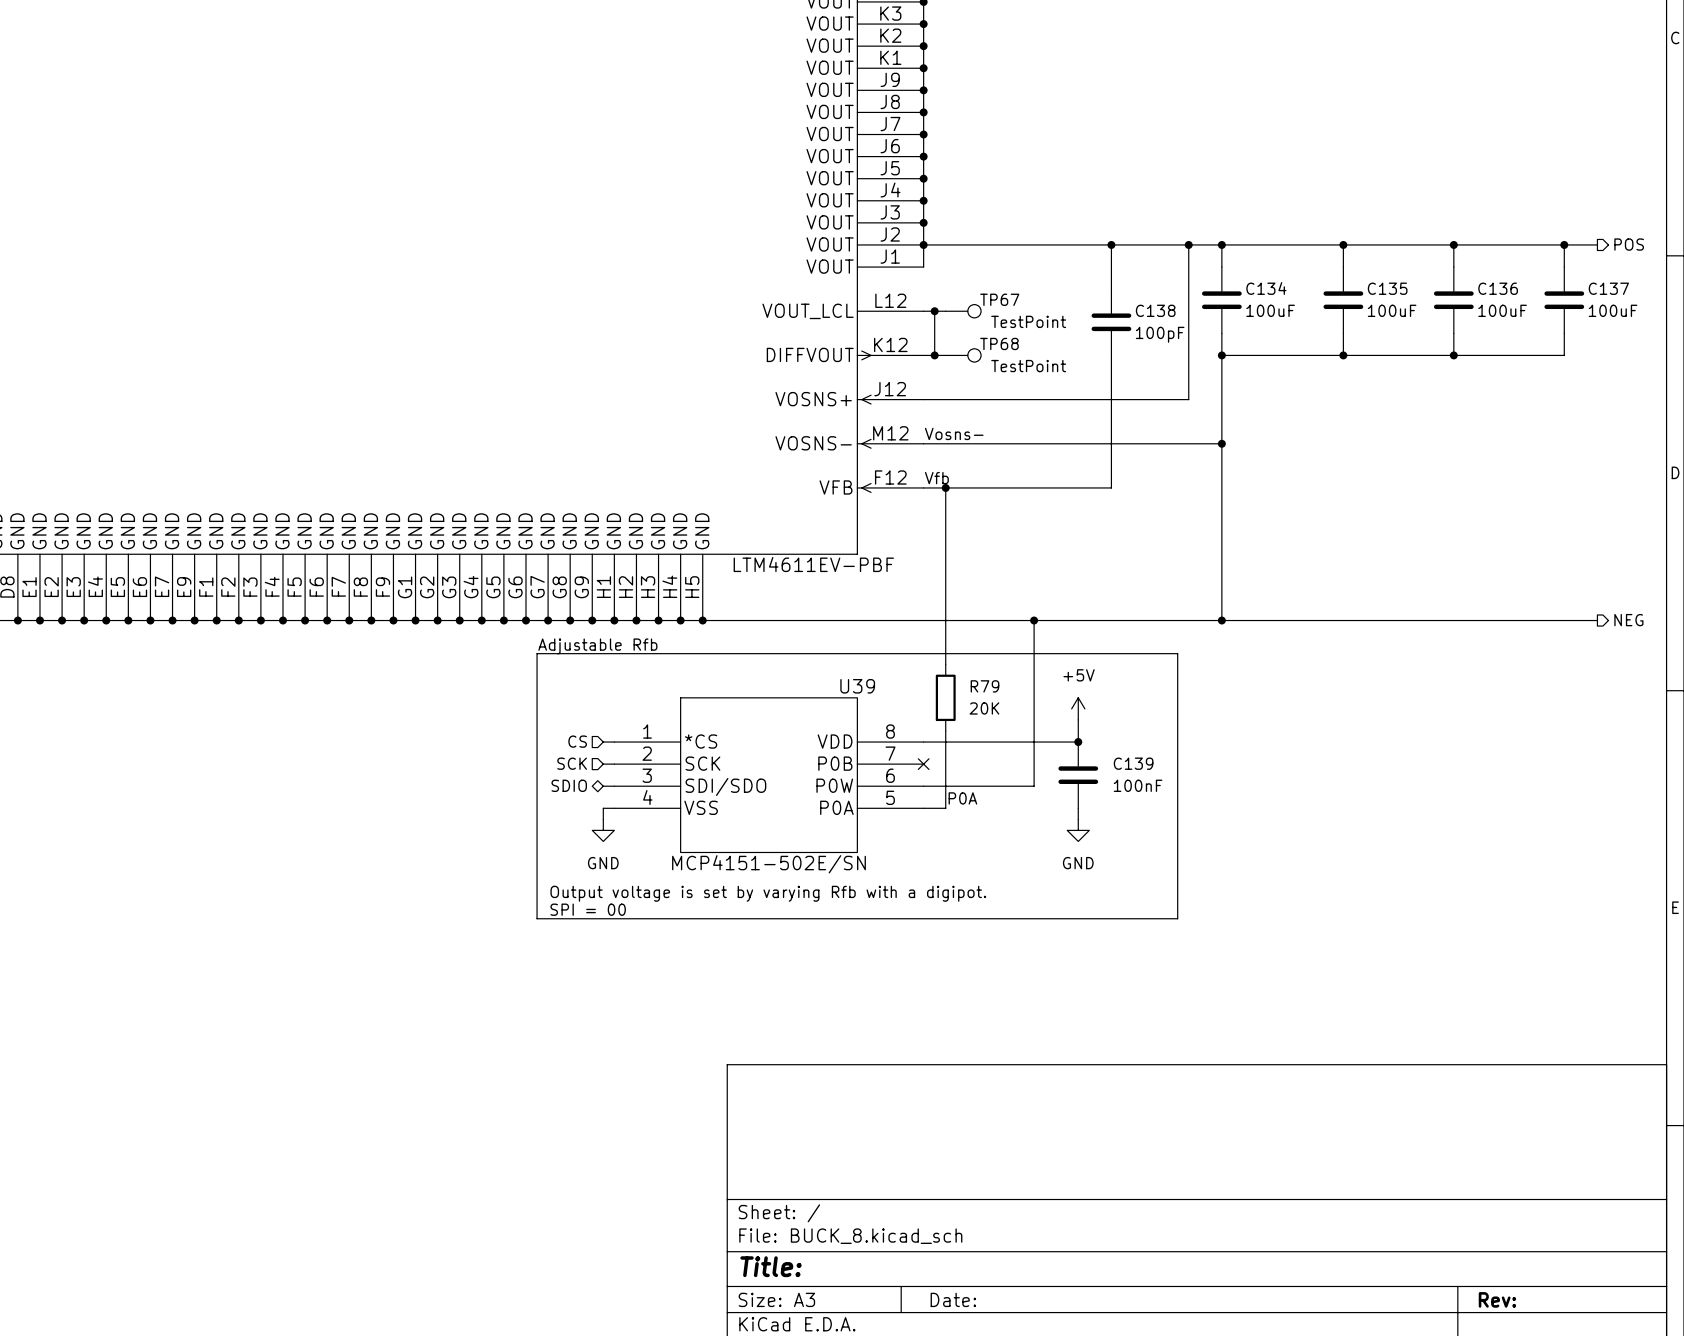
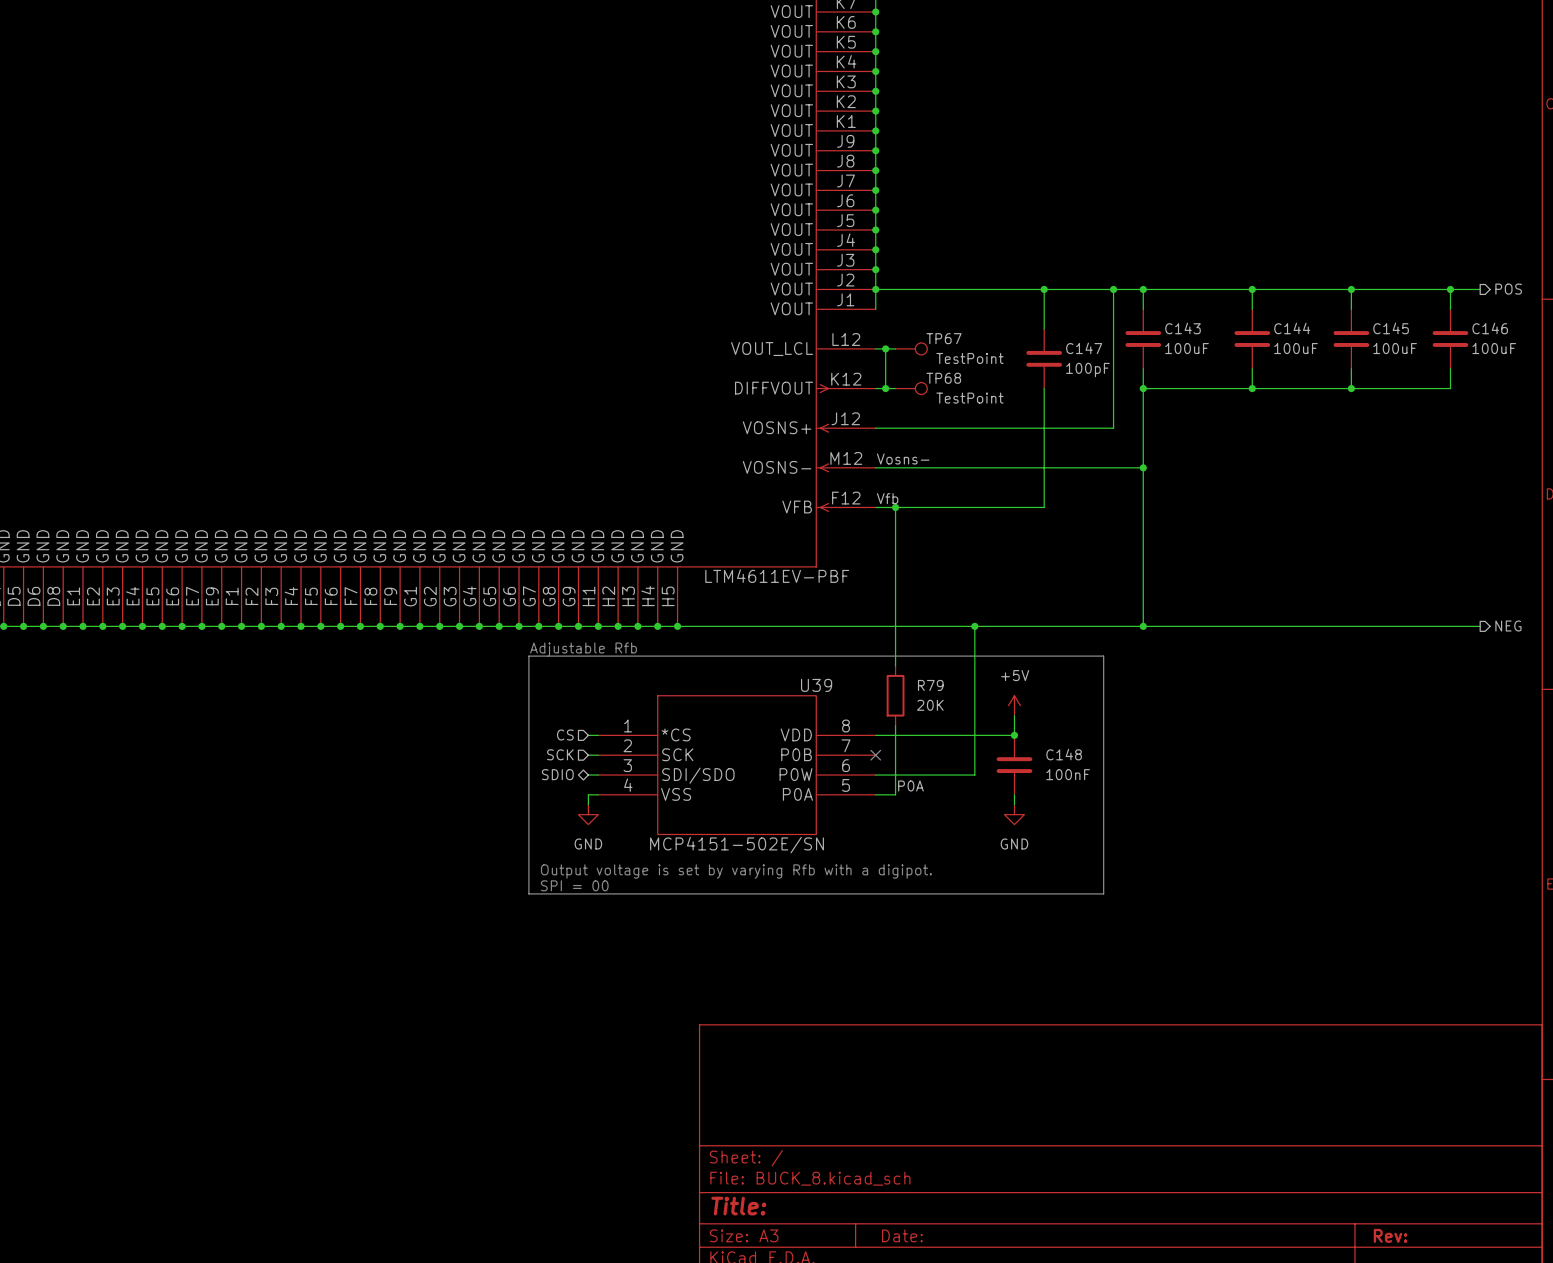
C134 name: C134 (1266, 288) -> C143 (1183, 328)
C135 name: C135 (1387, 288) -> C144 (1292, 328)
C136 name: C136 (1498, 288) -> C145 (1391, 328)
C137 name: C137 (1608, 288) -> C146 (1490, 328)
C138 name: C138 (1155, 310) -> C147 (1084, 348)
C139 name: C139 (1133, 763) -> C148 (1064, 754)

